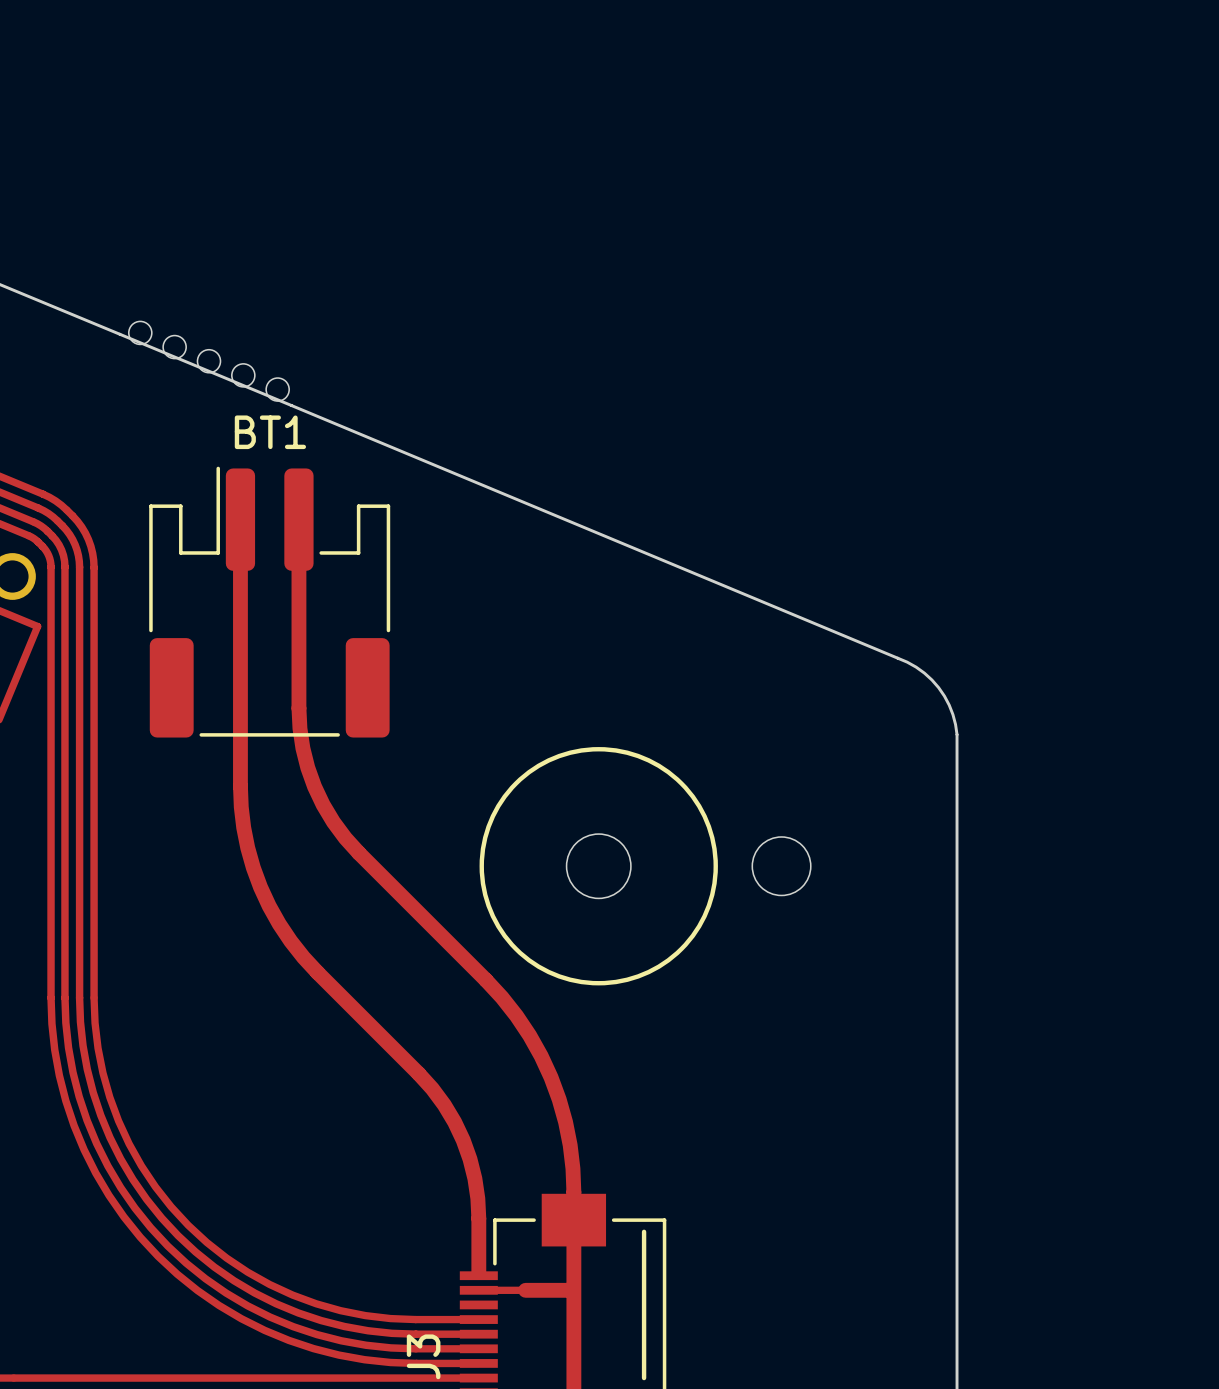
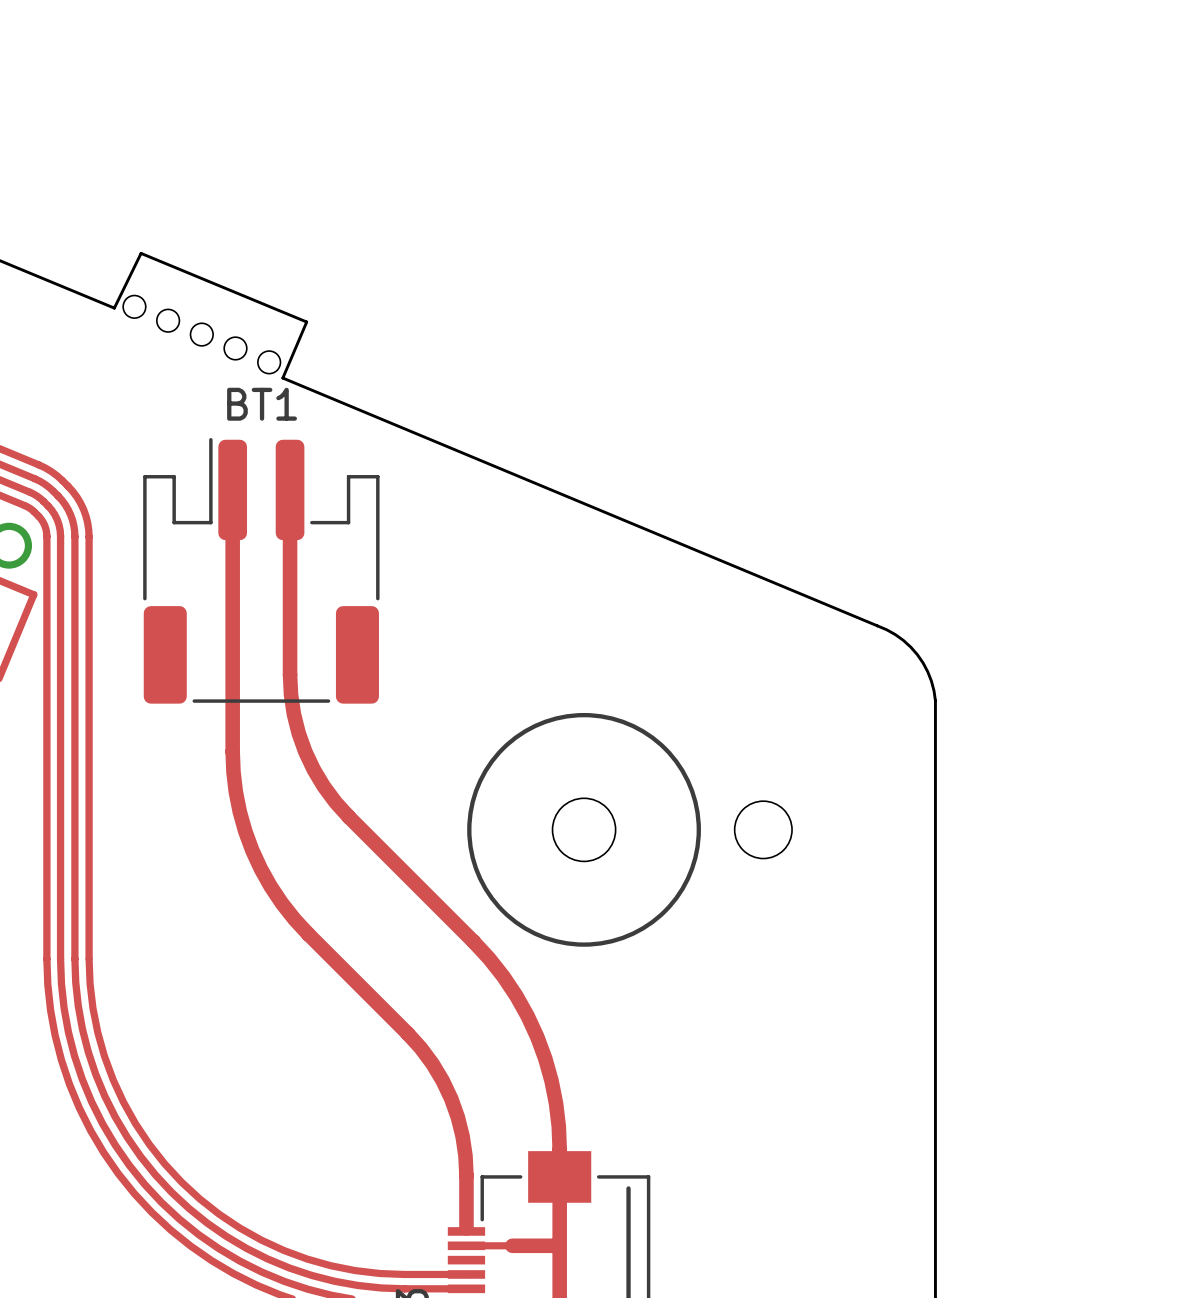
board edge: (119, 334) (291, 405) -> (114, 308) (141, 253) (306, 322) (282, 378)

